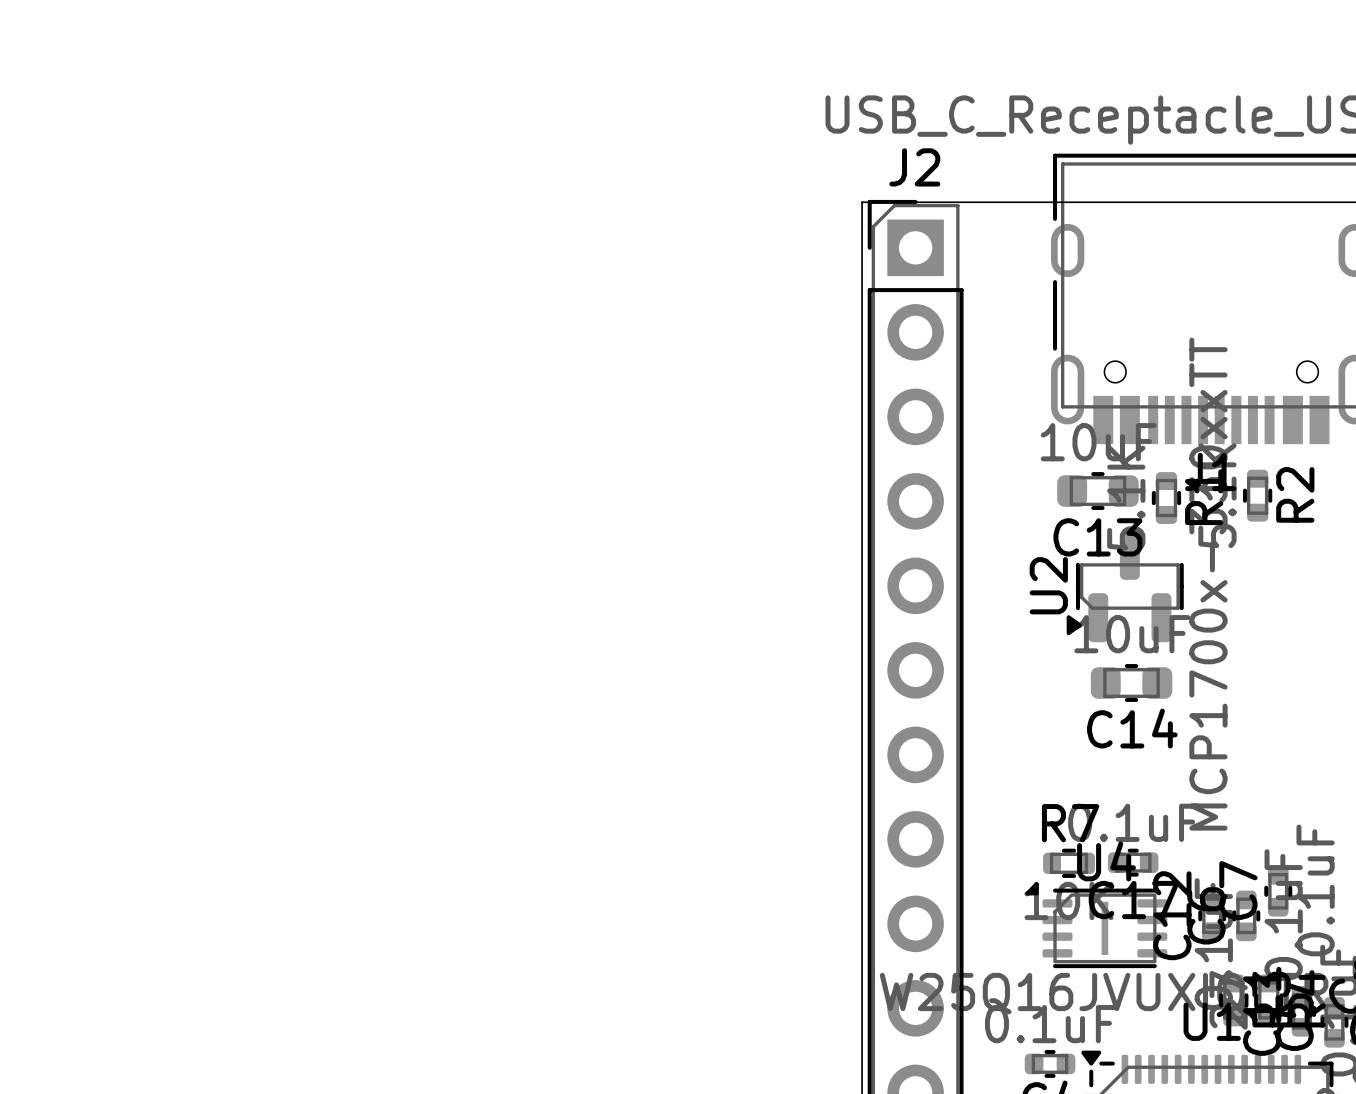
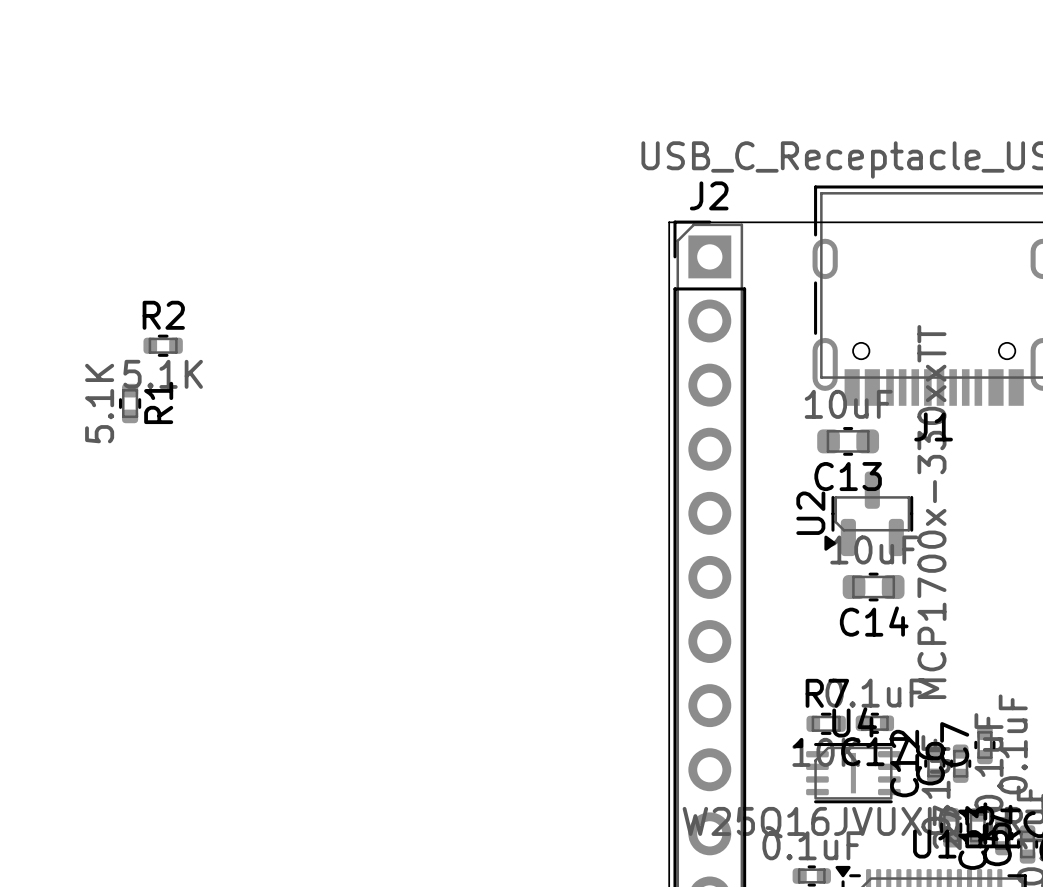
R2 rotation: 0° (1257, 495) -> 90° clockwise (163, 345)
R2 position: (1257, 495) -> (163, 345)
R1 position: (1166, 498) -> (130, 403)

